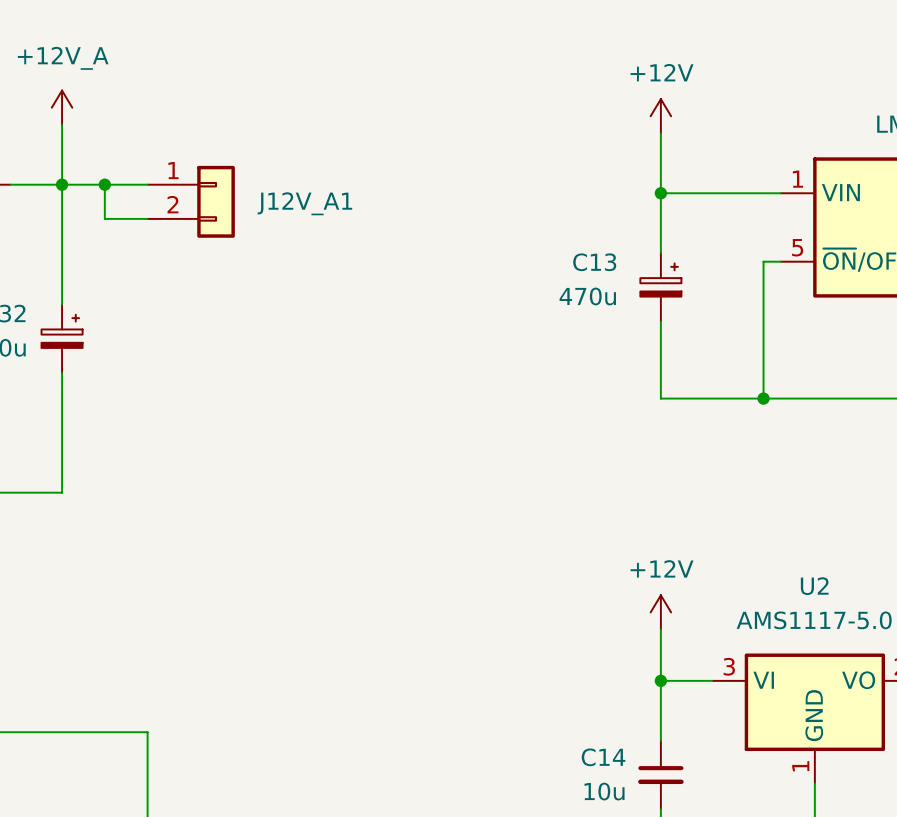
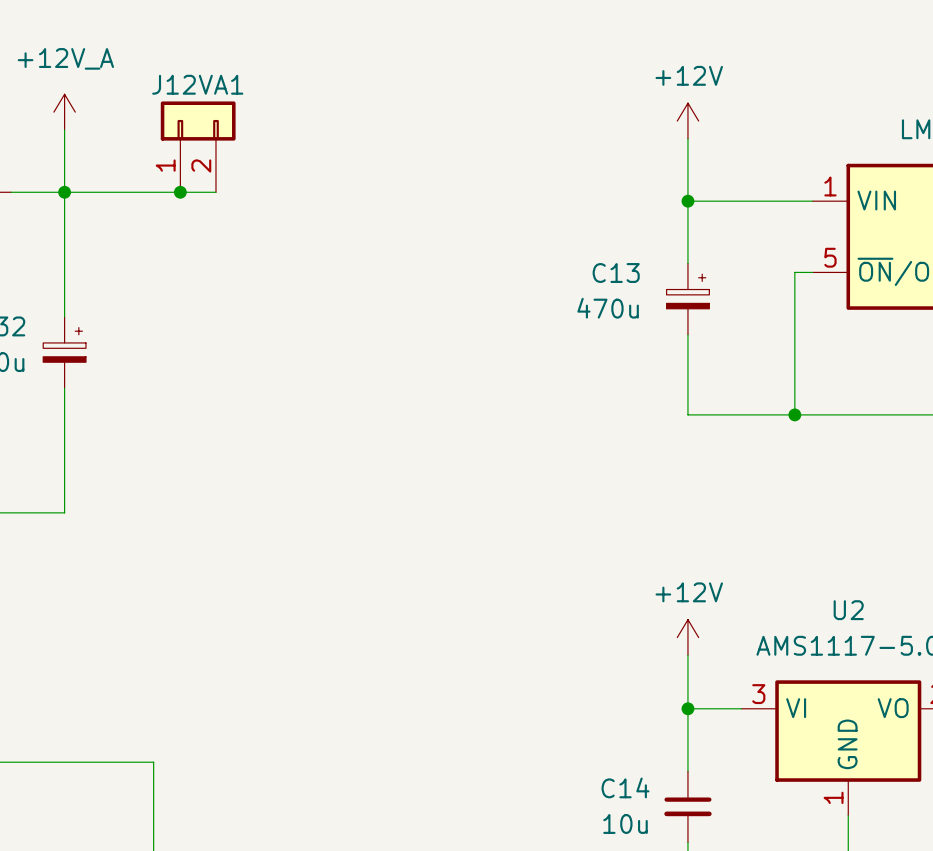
J12VA1: none -> (198, 146)
wire: (104, 184) (104, 218) (147, 218) -> none
junction position: (104, 184) -> (180, 192)
J12V_A1: (191, 201) -> none

